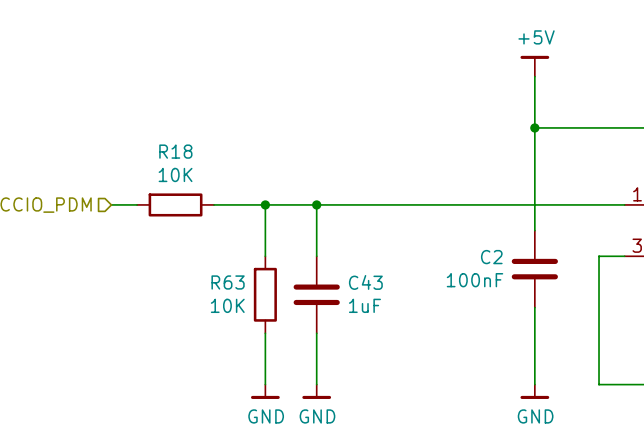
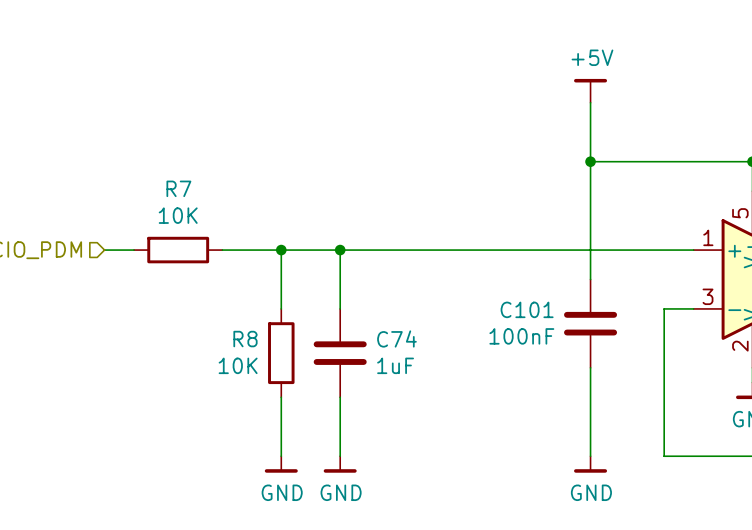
R18 name: R18 (175, 151) -> R7 (178, 188)
C2 name: C2 (491, 257) -> C101 (527, 309)
R63 name: R63 (228, 282) -> R8 (245, 339)
C43 name: C43 (365, 282) -> C74 (396, 338)

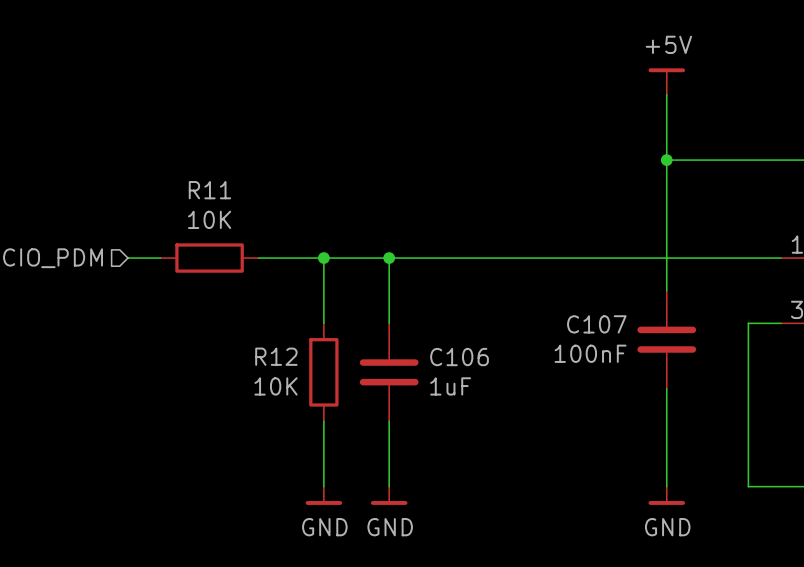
R7 name: R7 (178, 188) -> R11 (209, 190)
C101 name: C101 (527, 309) -> C107 (596, 324)
C74 name: C74 (396, 338) -> C106 (459, 357)
R8 name: R8 (245, 339) -> R12 (276, 356)

